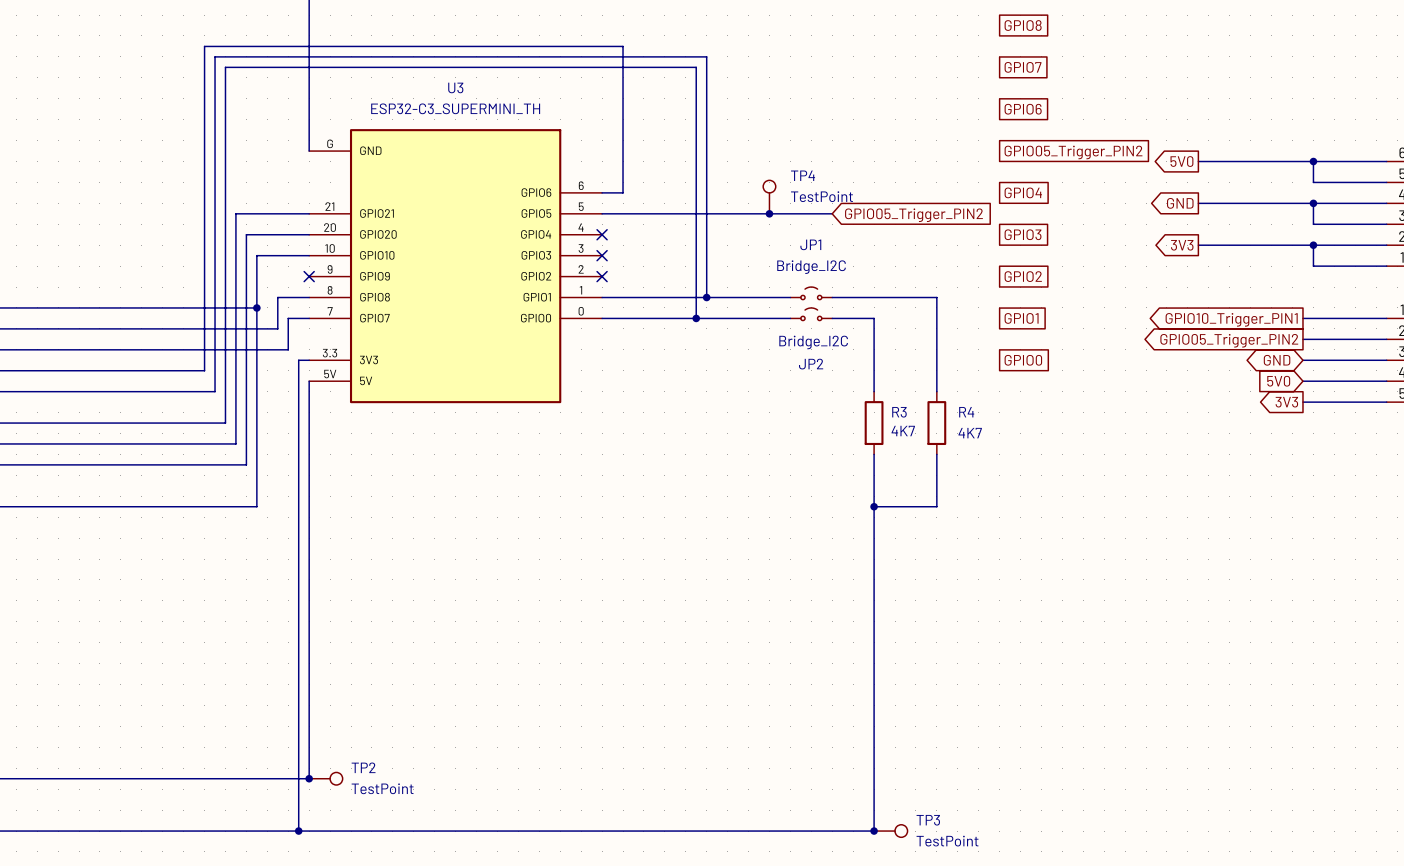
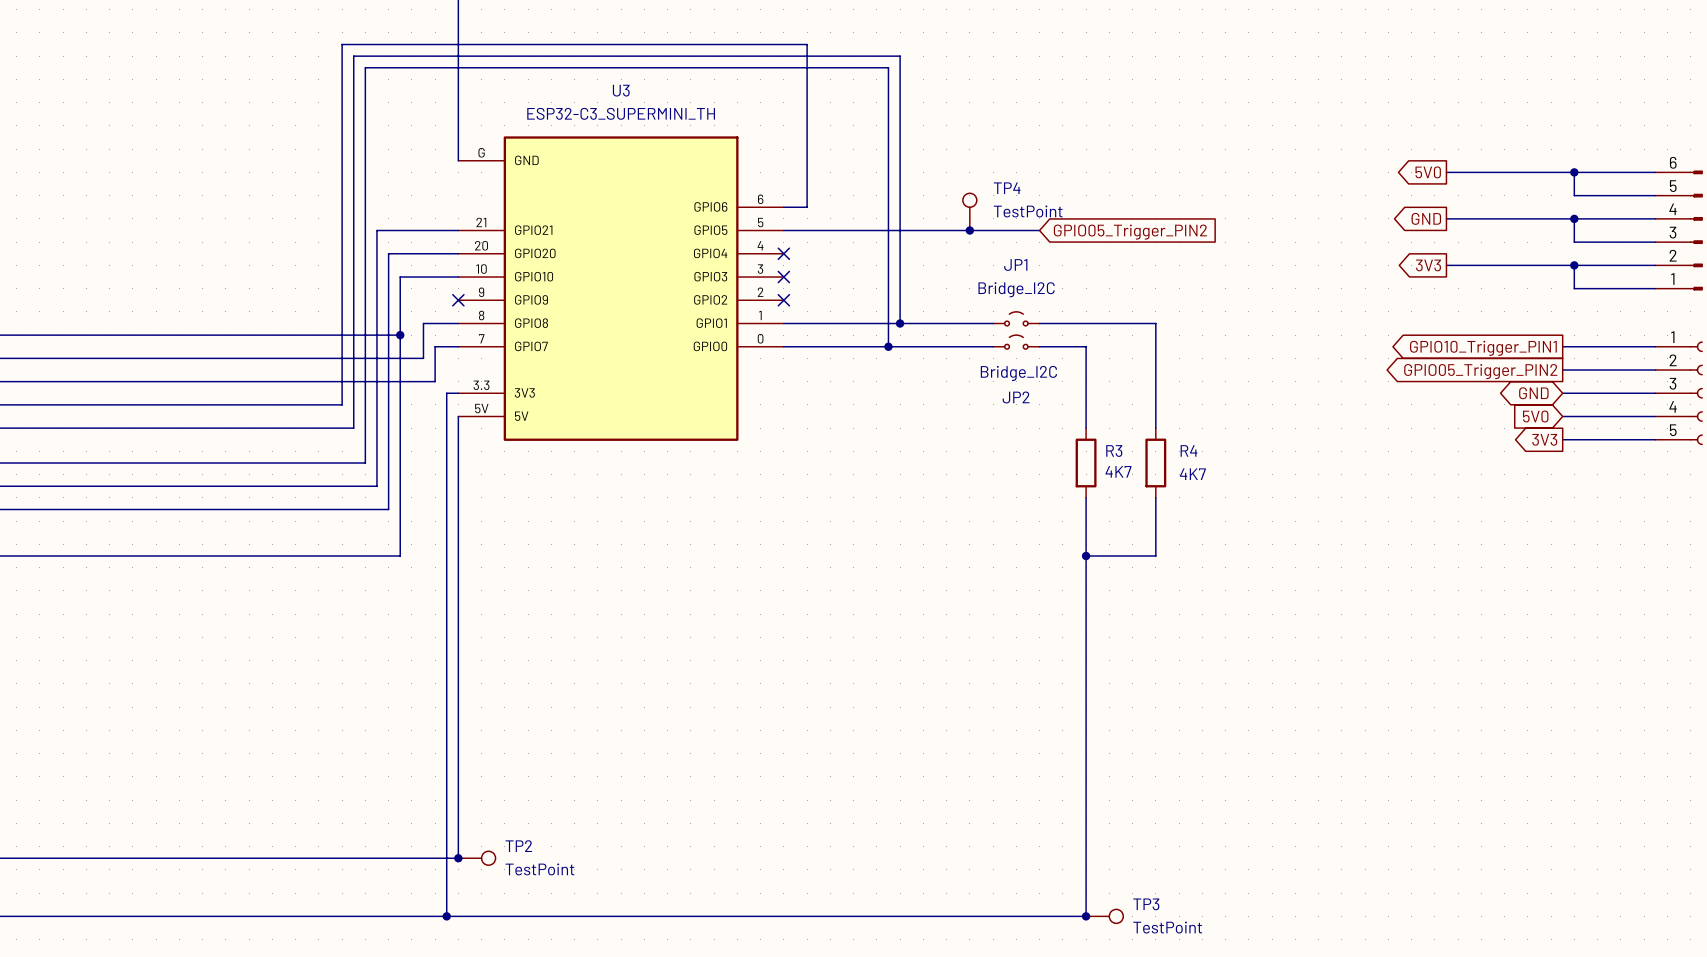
global label: GPIO8 (1023, 25) -> none
global label: GPIO7 (1023, 67) -> none
global label: GPIO6 (1023, 109) -> none
global label: GPIO05_Trigger_PIN2 (1073, 152) -> none
global label: GPIO4 (1023, 192) -> none
global label: GPIO3 (1023, 234) -> none
global label: GPIO2 (1023, 276) -> none
global label: GPIO1 (1021, 318) -> none
global label: GPIO0 (1023, 360) -> none

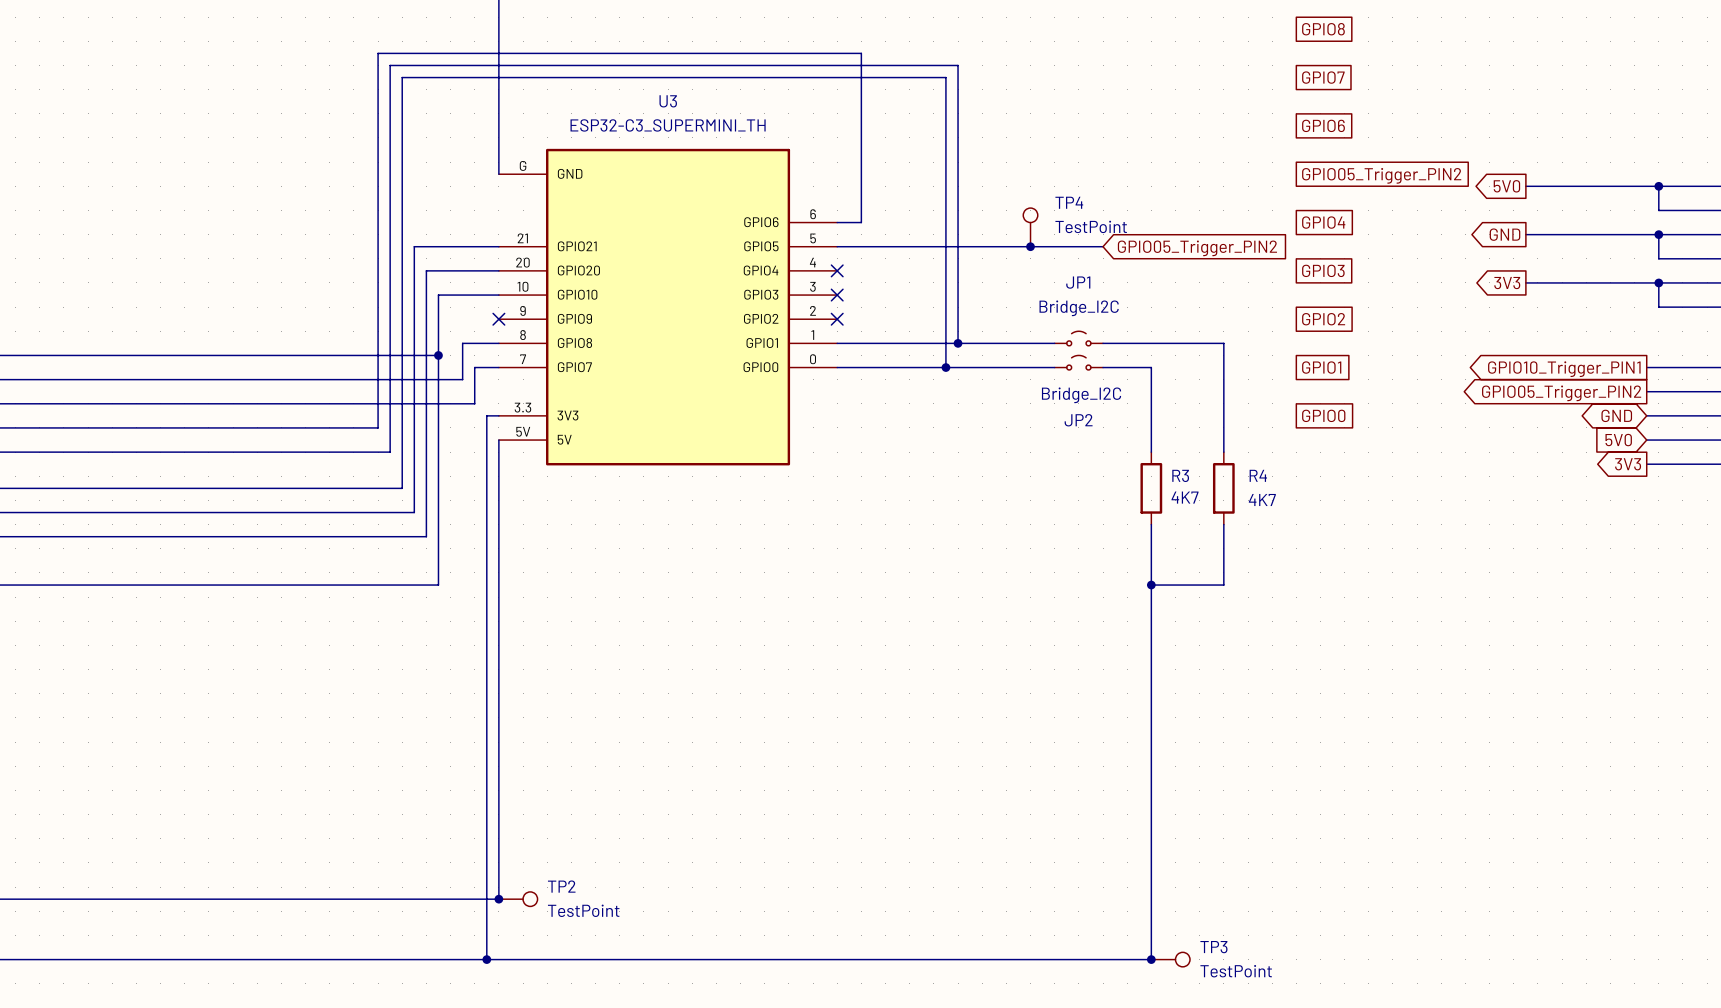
global label: none -> GPIO8 (1323, 29)
global label: none -> GPIO7 (1323, 77)
global label: none -> GPIO6 (1323, 125)
global label: none -> GPIO05_Trigger_PIN2 (1381, 175)
global label: none -> GPIO4 (1323, 222)
global label: none -> GPIO3 (1323, 270)
global label: none -> GPIO2 (1323, 319)
global label: none -> GPIO1 (1321, 367)
global label: none -> GPIO0 (1323, 415)

